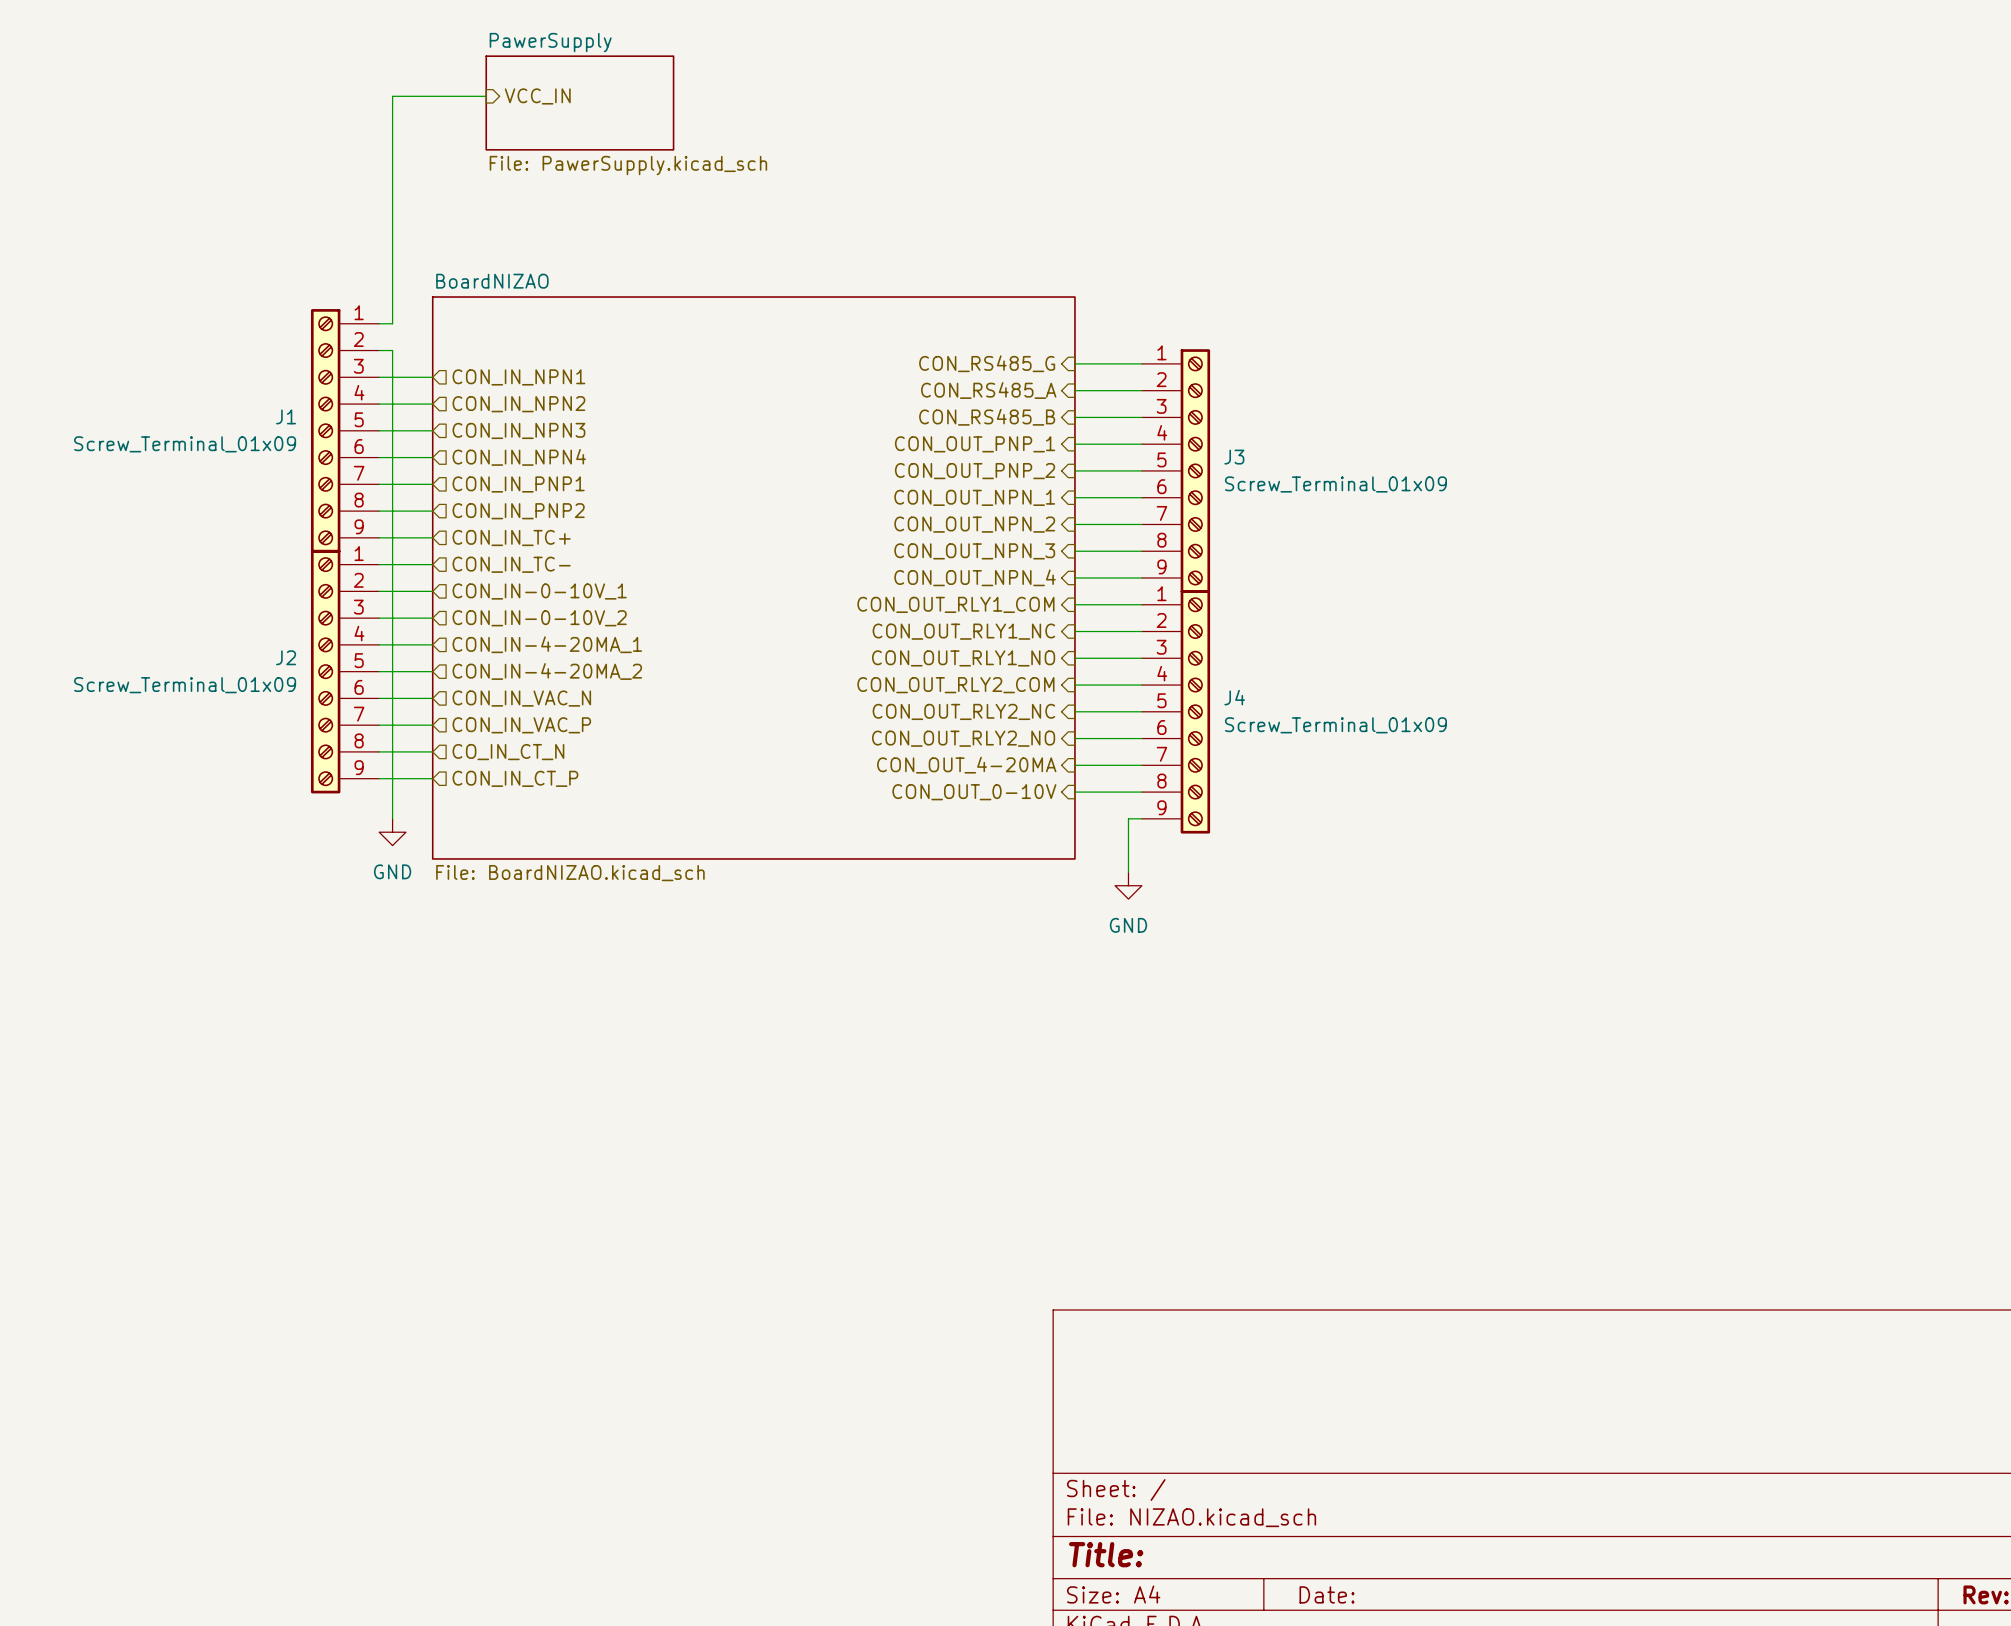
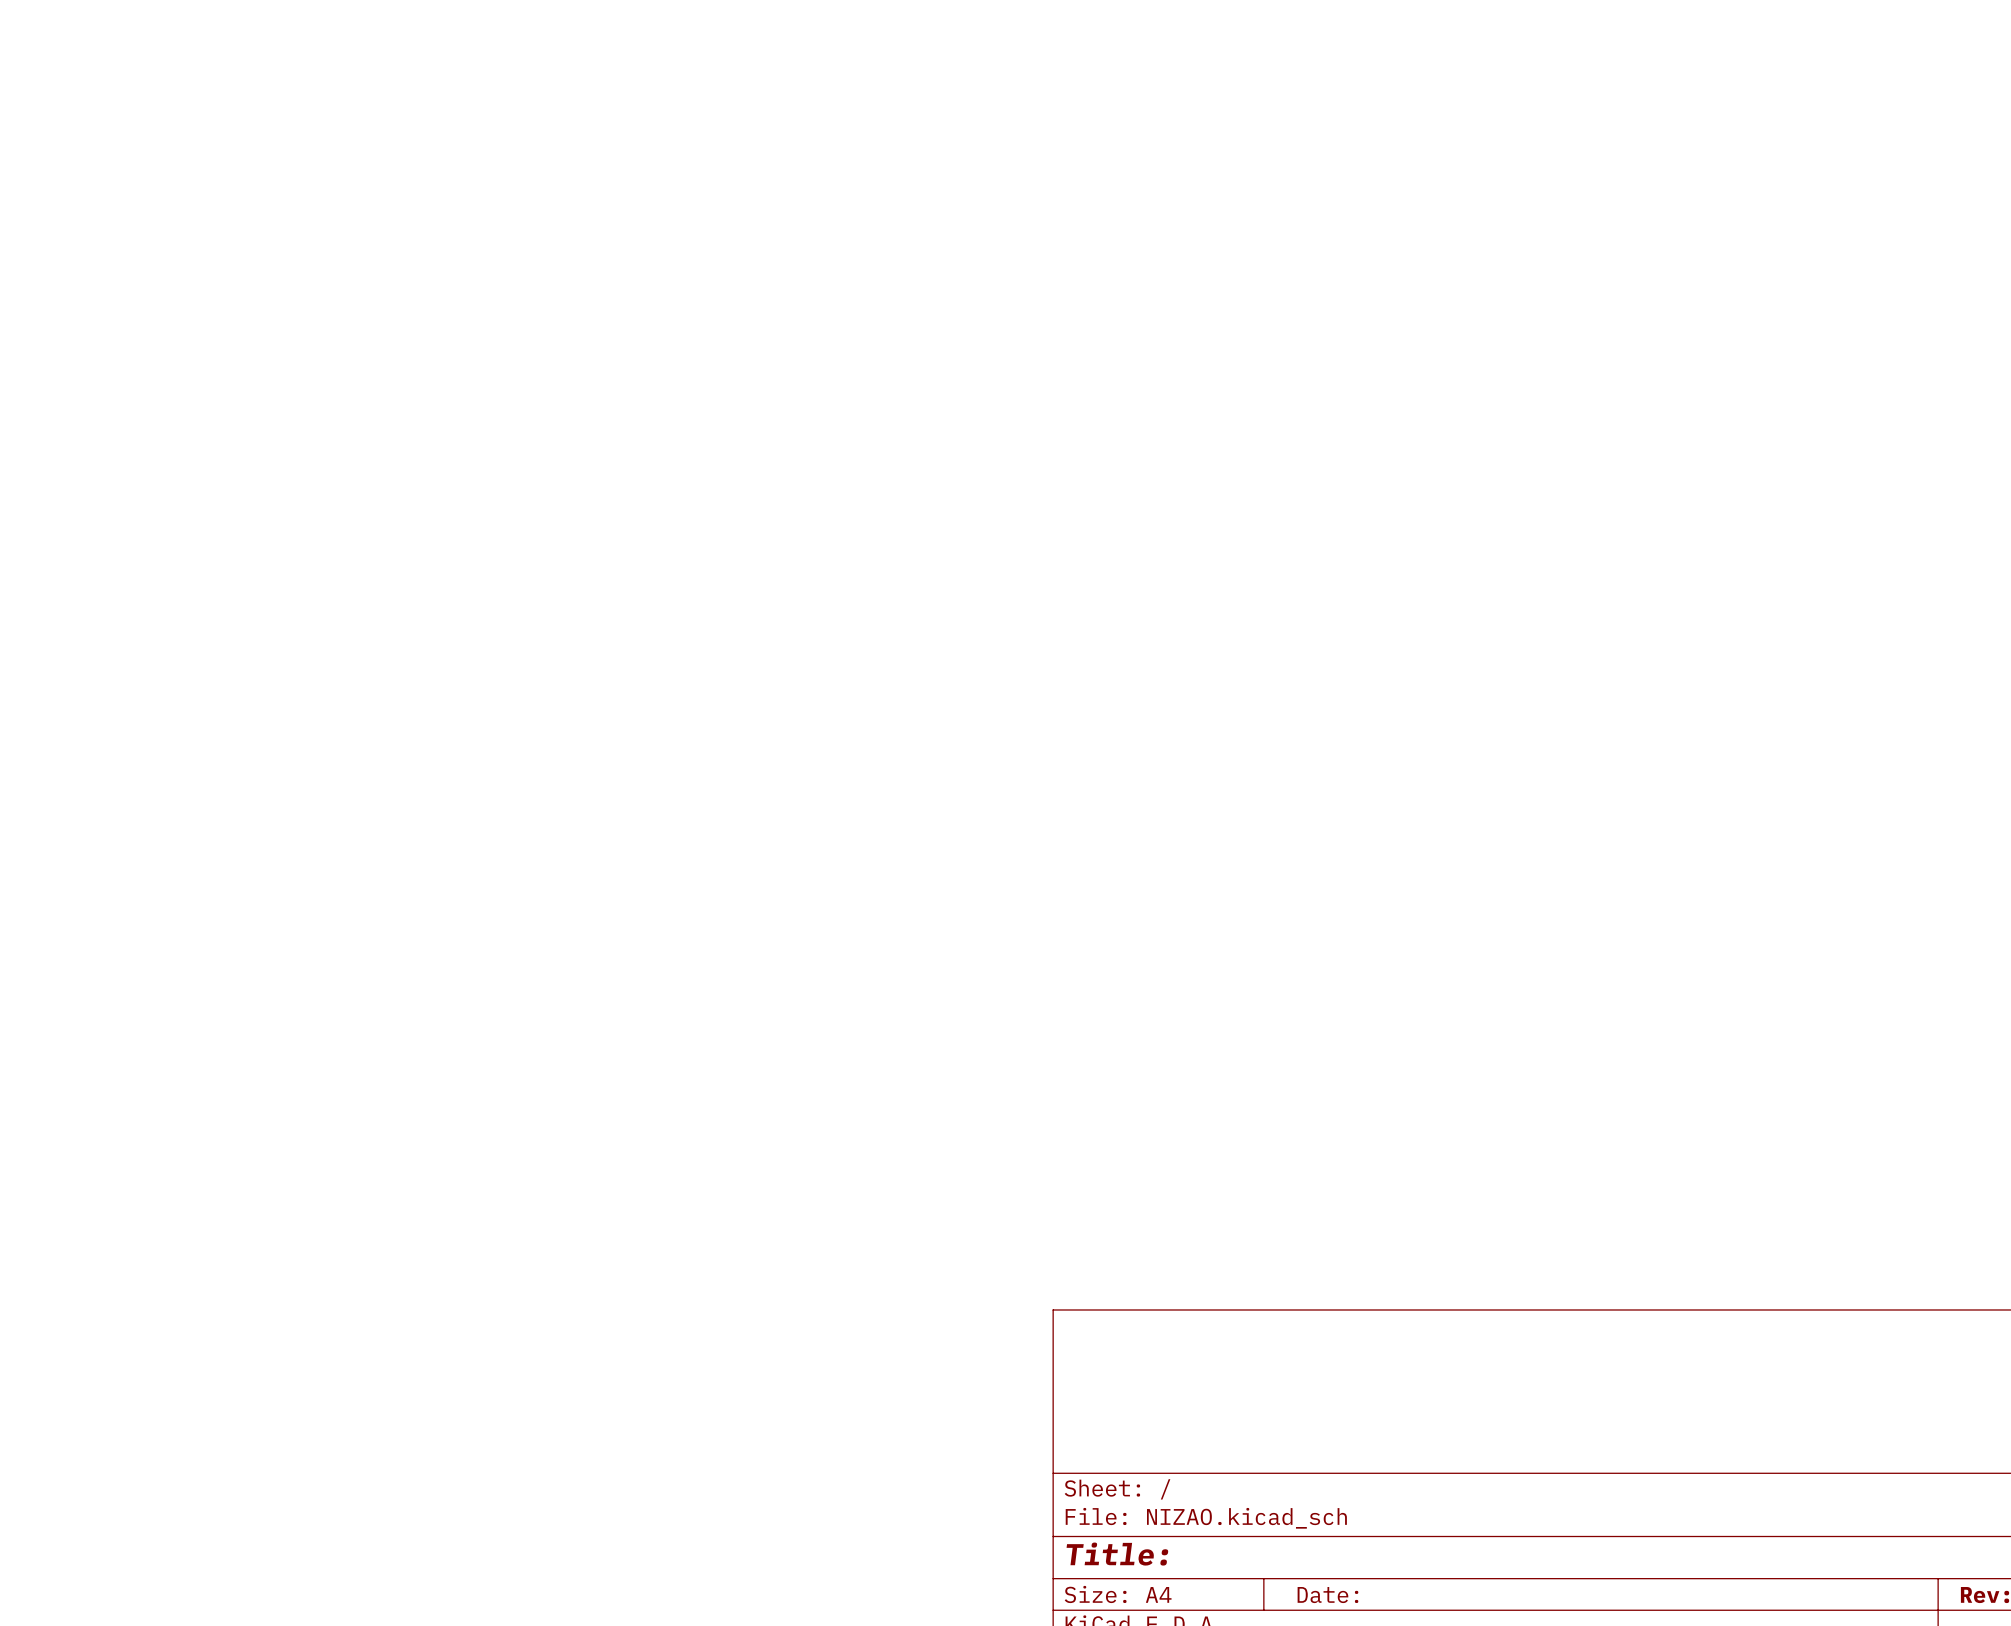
wire: (486, 96) (392, 96) (392, 323) (379, 323) -> none
hierarchical label: VCC_IN (537, 96) -> none
sheet PawerSupply: File: PawerSupply.kicad_sch (579, 103) -> none
wire: (379, 350) (392, 350) (392, 818) -> none
hierarchical label: CON_RS485_G (987, 363) -> none
wire: (1074, 363) (1141, 363) -> none
wire: (379, 377) (432, 377) -> none
hierarchical label: CON_IN_NPN1 (518, 377) -> none
hierarchical label: CON_RS485_A (988, 390) -> none
wire: (1074, 390) (1141, 390) -> none
wire: (379, 404) (432, 404) -> none
hierarchical label: CON_IN_NPN2 (518, 404) -> none
hierarchical label: CON_RS485_B (987, 417) -> none
wire: (1074, 417) (1141, 417) -> none
J1: Screw_Terminal_01x09 (345, 430) -> none
wire: (379, 430) (432, 430) -> none
hierarchical label: CON_IN_NPN3 (518, 430) -> none
hierarchical label: CON_OUT_PNP_1 (975, 444) -> none
wire: (1074, 444) (1141, 444) -> none
wire: (379, 457) (432, 457) -> none
hierarchical label: CON_IN_NPN4 (519, 457) -> none
wire: (1074, 470) (1141, 470) -> none
J3: Screw_Terminal_01x09 (1175, 470) -> none
hierarchical label: CON_OUT_PNP_2 (975, 471) -> none
wire: (379, 484) (432, 484) -> none
hierarchical label: CON_IN_PNP1 (518, 484) -> none
hierarchical label: CON_OUT_NPN_1 (974, 497) -> none
wire: (1074, 497) (1141, 497) -> none
wire: (379, 511) (432, 511) -> none
hierarchical label: CON_IN_PNP2 (518, 511) -> none
hierarchical label: CON_OUT_NPN_2 (974, 524) -> none
wire: (1074, 524) (1141, 524) -> none
wire: (379, 537) (432, 537) -> none
hierarchical label: CON_IN_TC+ (511, 537) -> none
hierarchical label: CON_OUT_NPN_3 (974, 551) -> none
wire: (1074, 551) (1141, 551) -> none
wire: (379, 564) (432, 564) -> none
hierarchical label: CON_IN_TC- (511, 564) -> none
sheet BoardNIZAO: File: BoardNIZAO.kicad_sch (753, 577) -> none
hierarchical label: CON_OUT_NPN_4 (975, 577) -> none
wire: (1074, 577) (1141, 577) -> none
wire: (379, 591) (432, 591) -> none
hierarchical label: CON_IN-0-10V_1 (539, 591) -> none
hierarchical label: CON_OUT_RLY1_COM (955, 604) -> none
wire: (1074, 604) (1141, 604) -> none
wire: (379, 618) (432, 618) -> none
hierarchical label: CON_IN-0-10V_2 (539, 618) -> none
hierarchical label: CON_OUT_RLY1_NC (963, 631) -> none
wire: (1074, 631) (1141, 631) -> none
wire: (379, 644) (432, 644) -> none
hierarchical label: CON_IN-4-20MA_1 (547, 644) -> none
hierarchical label: CON_OUT_RLY1_NO (963, 658) -> none
wire: (1074, 658) (1141, 658) -> none
J2: Screw_Terminal_01x09 (345, 671) -> none
wire: (379, 671) (432, 671) -> none
hierarchical label: CON_IN-4-20MA_2 (547, 671) -> none
hierarchical label: CON_OUT_RLY2_COM (955, 685) -> none
wire: (1074, 685) (1141, 685) -> none
wire: (379, 698) (432, 698) -> none
hierarchical label: CON_IN_VAC_N (521, 698) -> none
hierarchical label: CON_OUT_RLY2_NC (963, 711) -> none
wire: (1074, 711) (1141, 711) -> none
J4: Screw_Terminal_01x09 (1175, 711) -> none
wire: (379, 725) (432, 725) -> none
hierarchical label: CON_IN_VAC_P (521, 725) -> none
hierarchical label: CON_OUT_RLY2_NO (963, 738) -> none
wire: (1074, 738) (1141, 738) -> none
wire: (379, 751) (432, 751) -> none
hierarchical label: CO_IN_CT_N (508, 752) -> none
hierarchical label: CON_OUT_4-20MA (966, 765) -> none
wire: (1074, 765) (1141, 765) -> none
wire: (379, 778) (432, 778) -> none
hierarchical label: CON_IN_CT_P (515, 778) -> none
hierarchical label: CON_OUT_0-10V (974, 792) -> none
wire: (1074, 792) (1141, 792) -> none
wire: (1141, 818) (1128, 818) (1128, 872) -> none
power symbol: GND (392, 832) -> none
power symbol: GND (1128, 885) -> none

